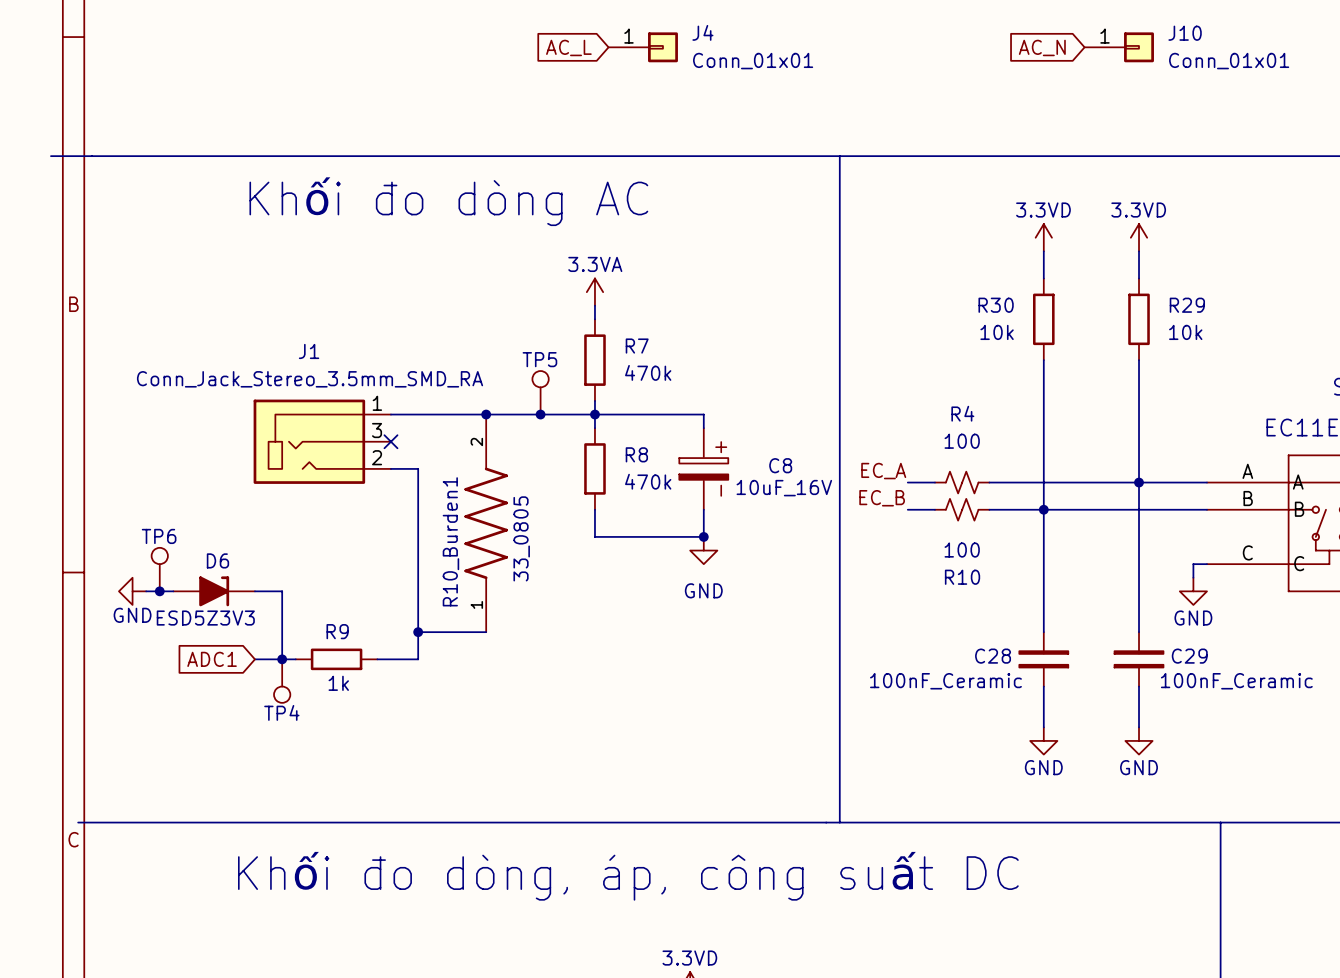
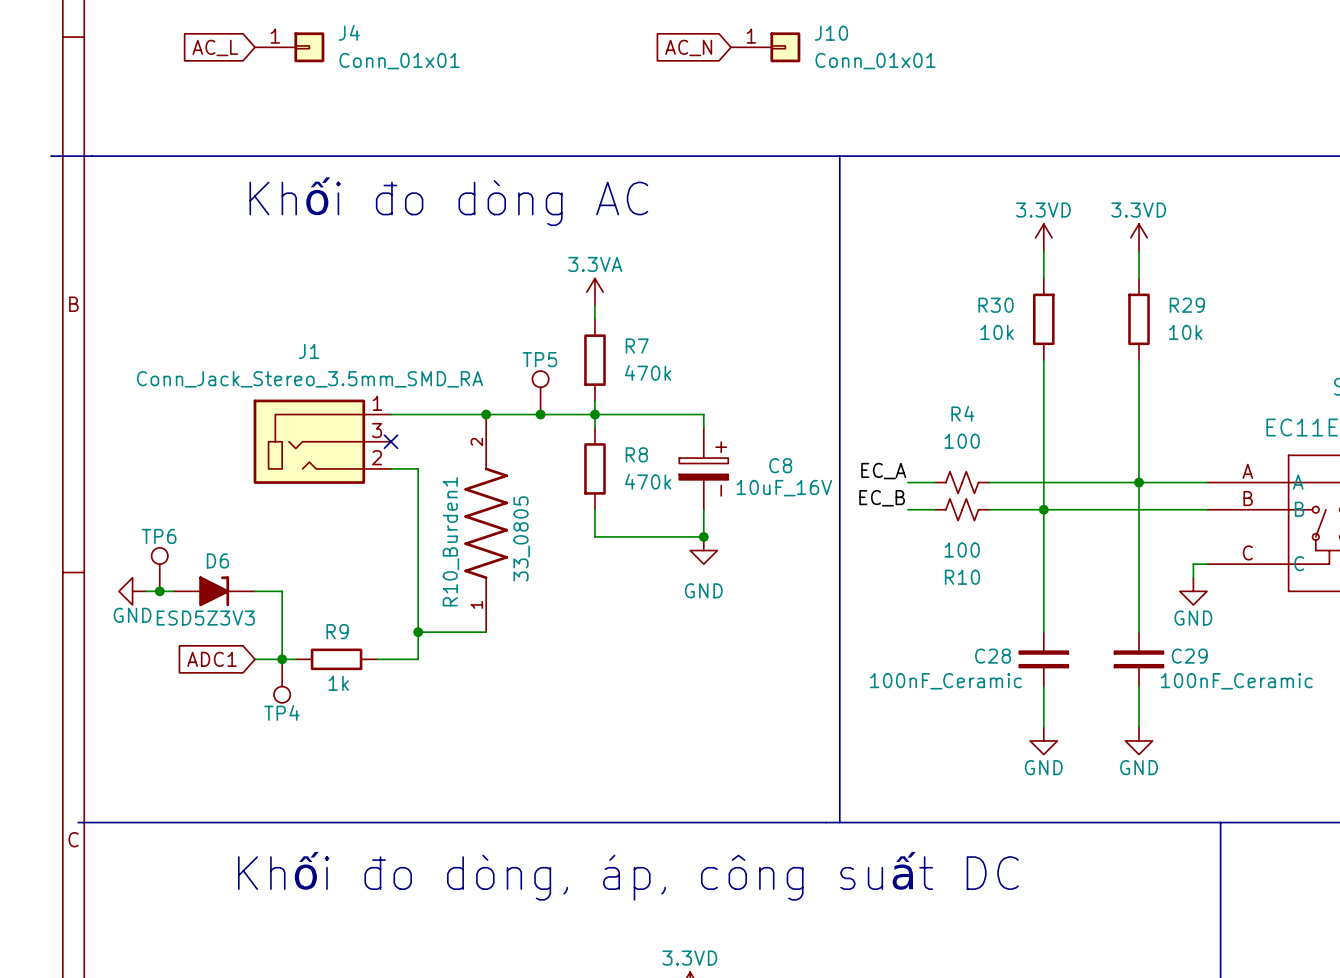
global label: none -> AC_L (215, 47)
global label: AC_L (568, 47) -> none
J4 position: (643, 47) -> (289, 47)
global label: none -> AC_N (688, 47)
global label: AC_N (1042, 47) -> none
J10 position: (1119, 47) -> (765, 47)

